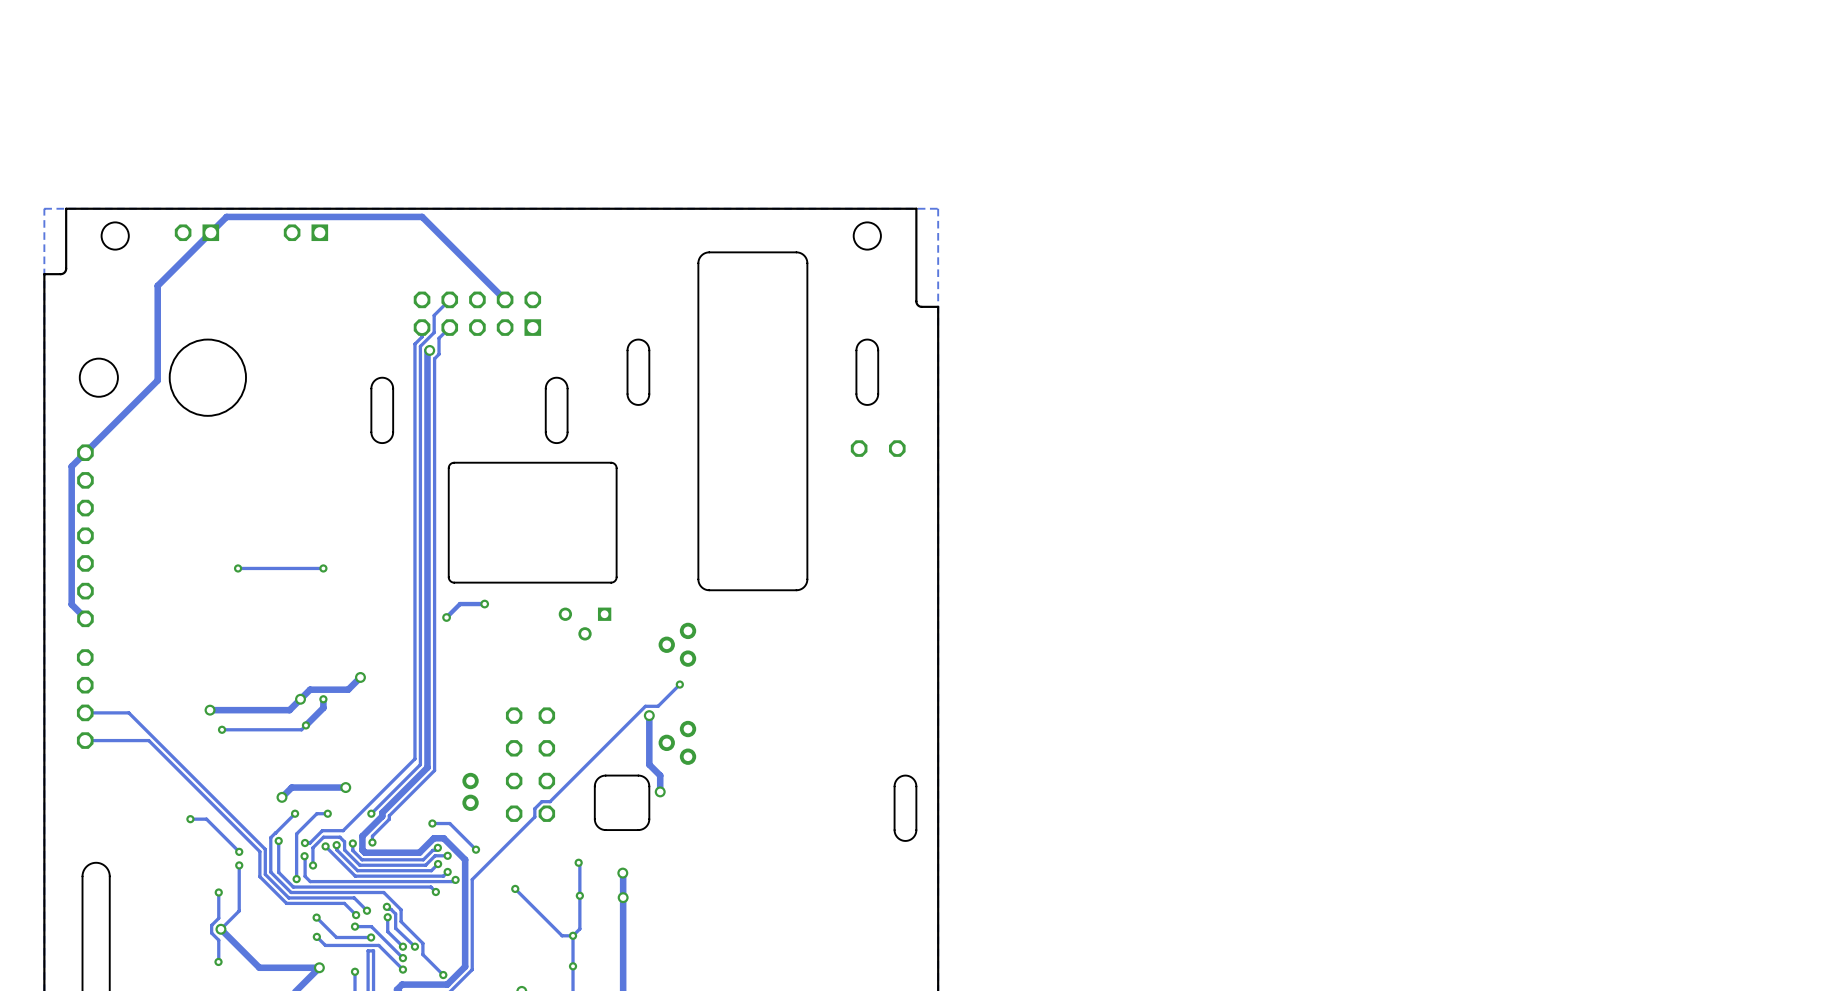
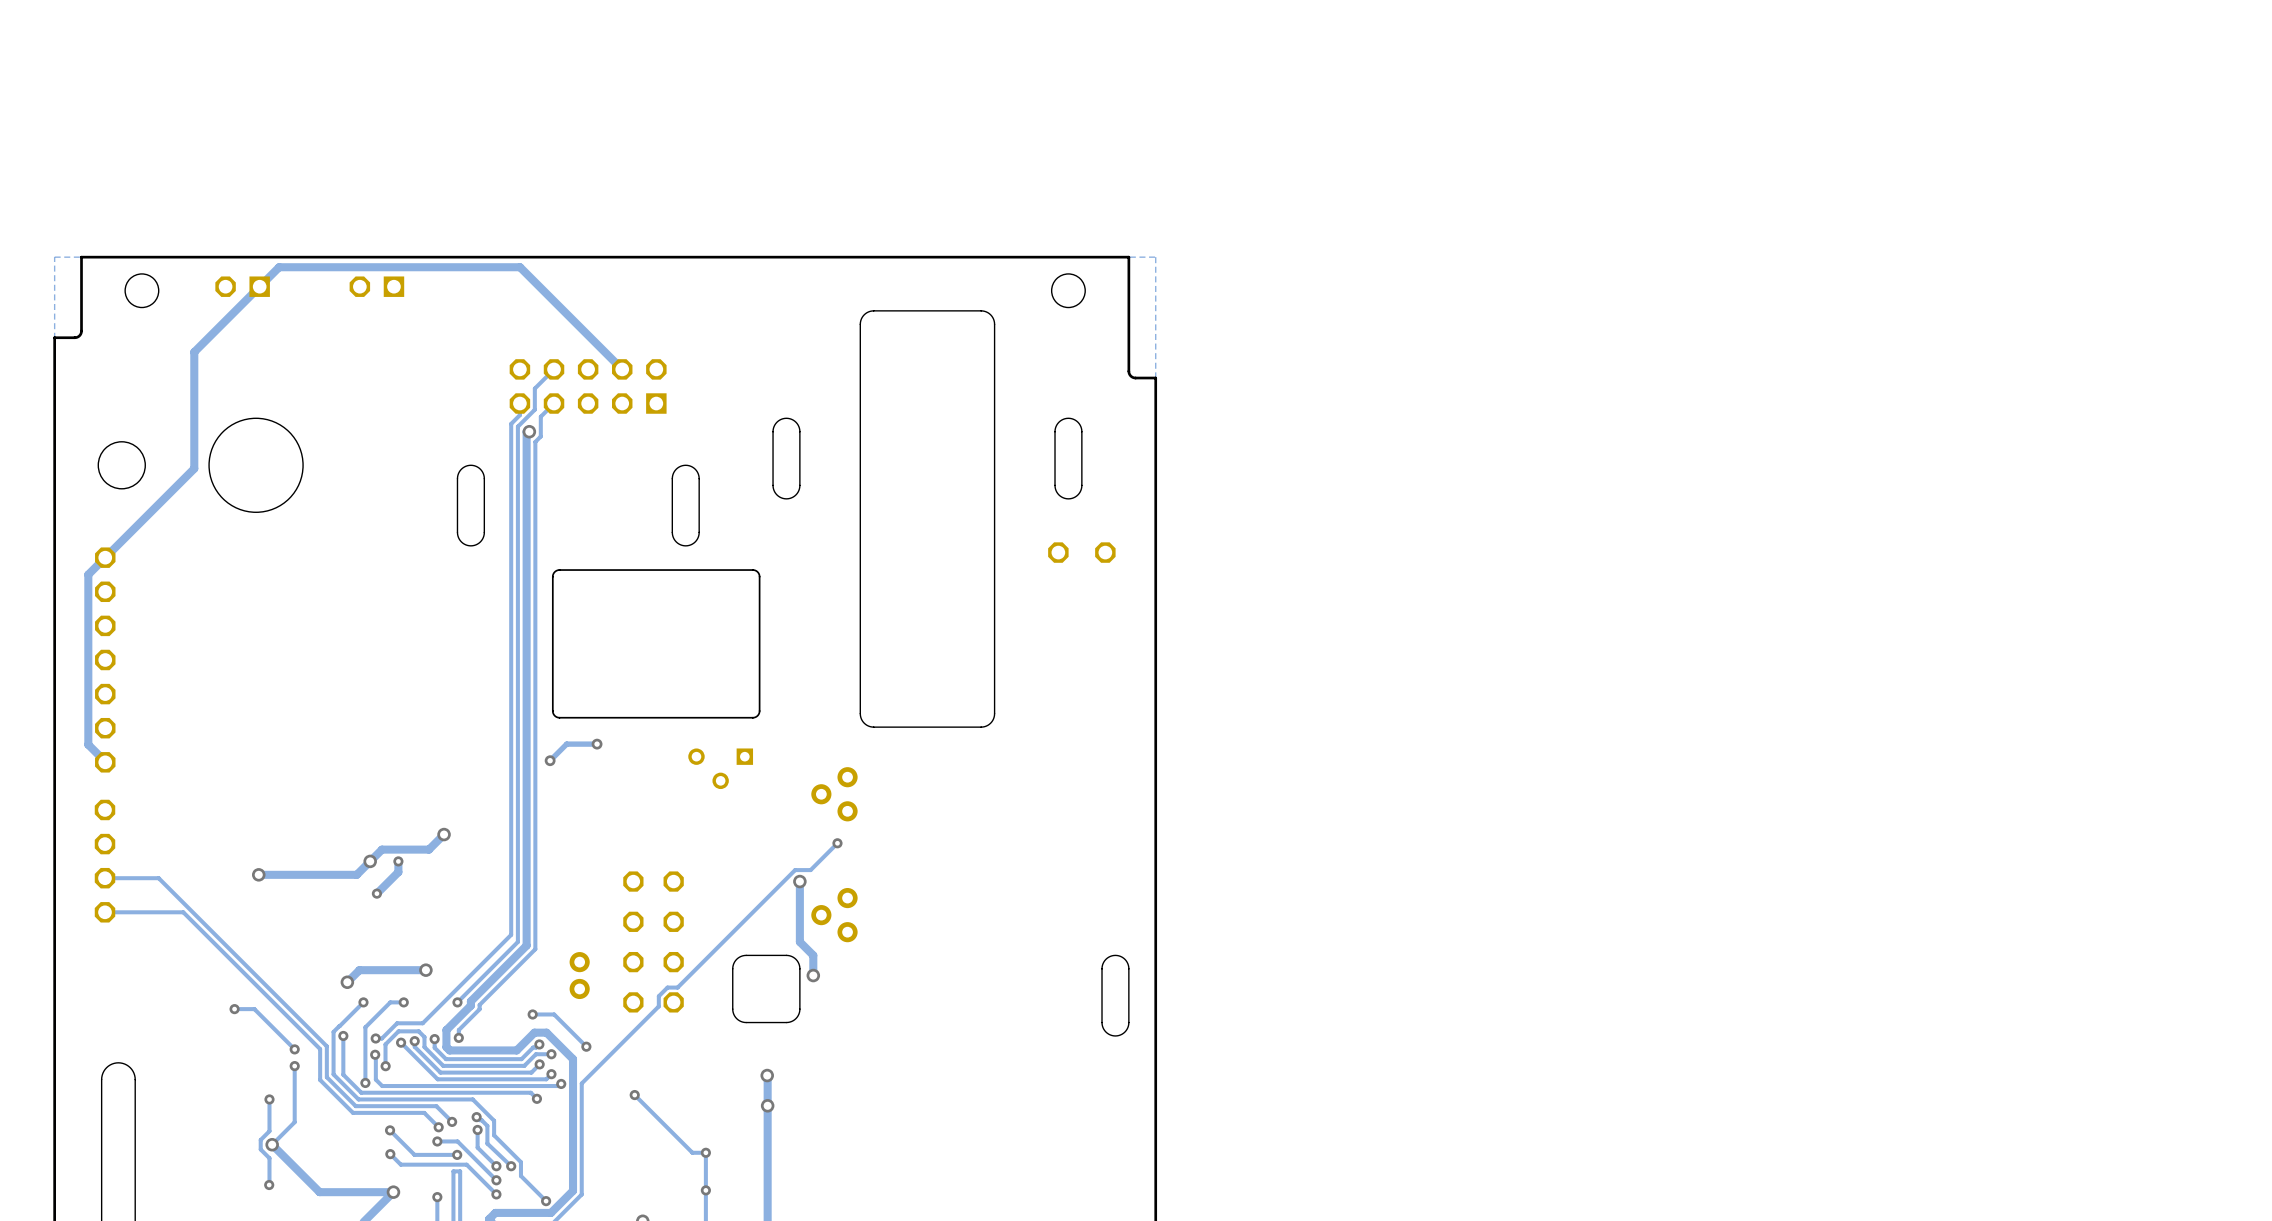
via: (238, 568) -> none
track: (323, 568) (238, 568) -> none
via: (323, 568) -> none
track: (305, 725) (301, 729) (222, 729) -> none
via: (222, 729) -> none
track: (578, 862) (579, 928) (573, 935) -> none
via: (578, 862) -> none
via: (579, 895) -> none

